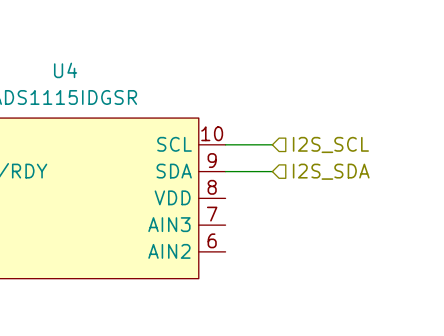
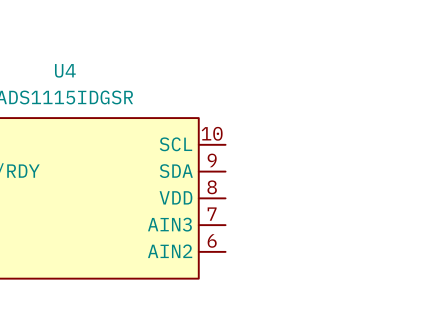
wire: (225, 144) (272, 144) -> none
hierarchical label: I2S_SCL (330, 144) -> none
wire: (225, 171) (272, 171) -> none
hierarchical label: I2S_SDA (331, 171) -> none

